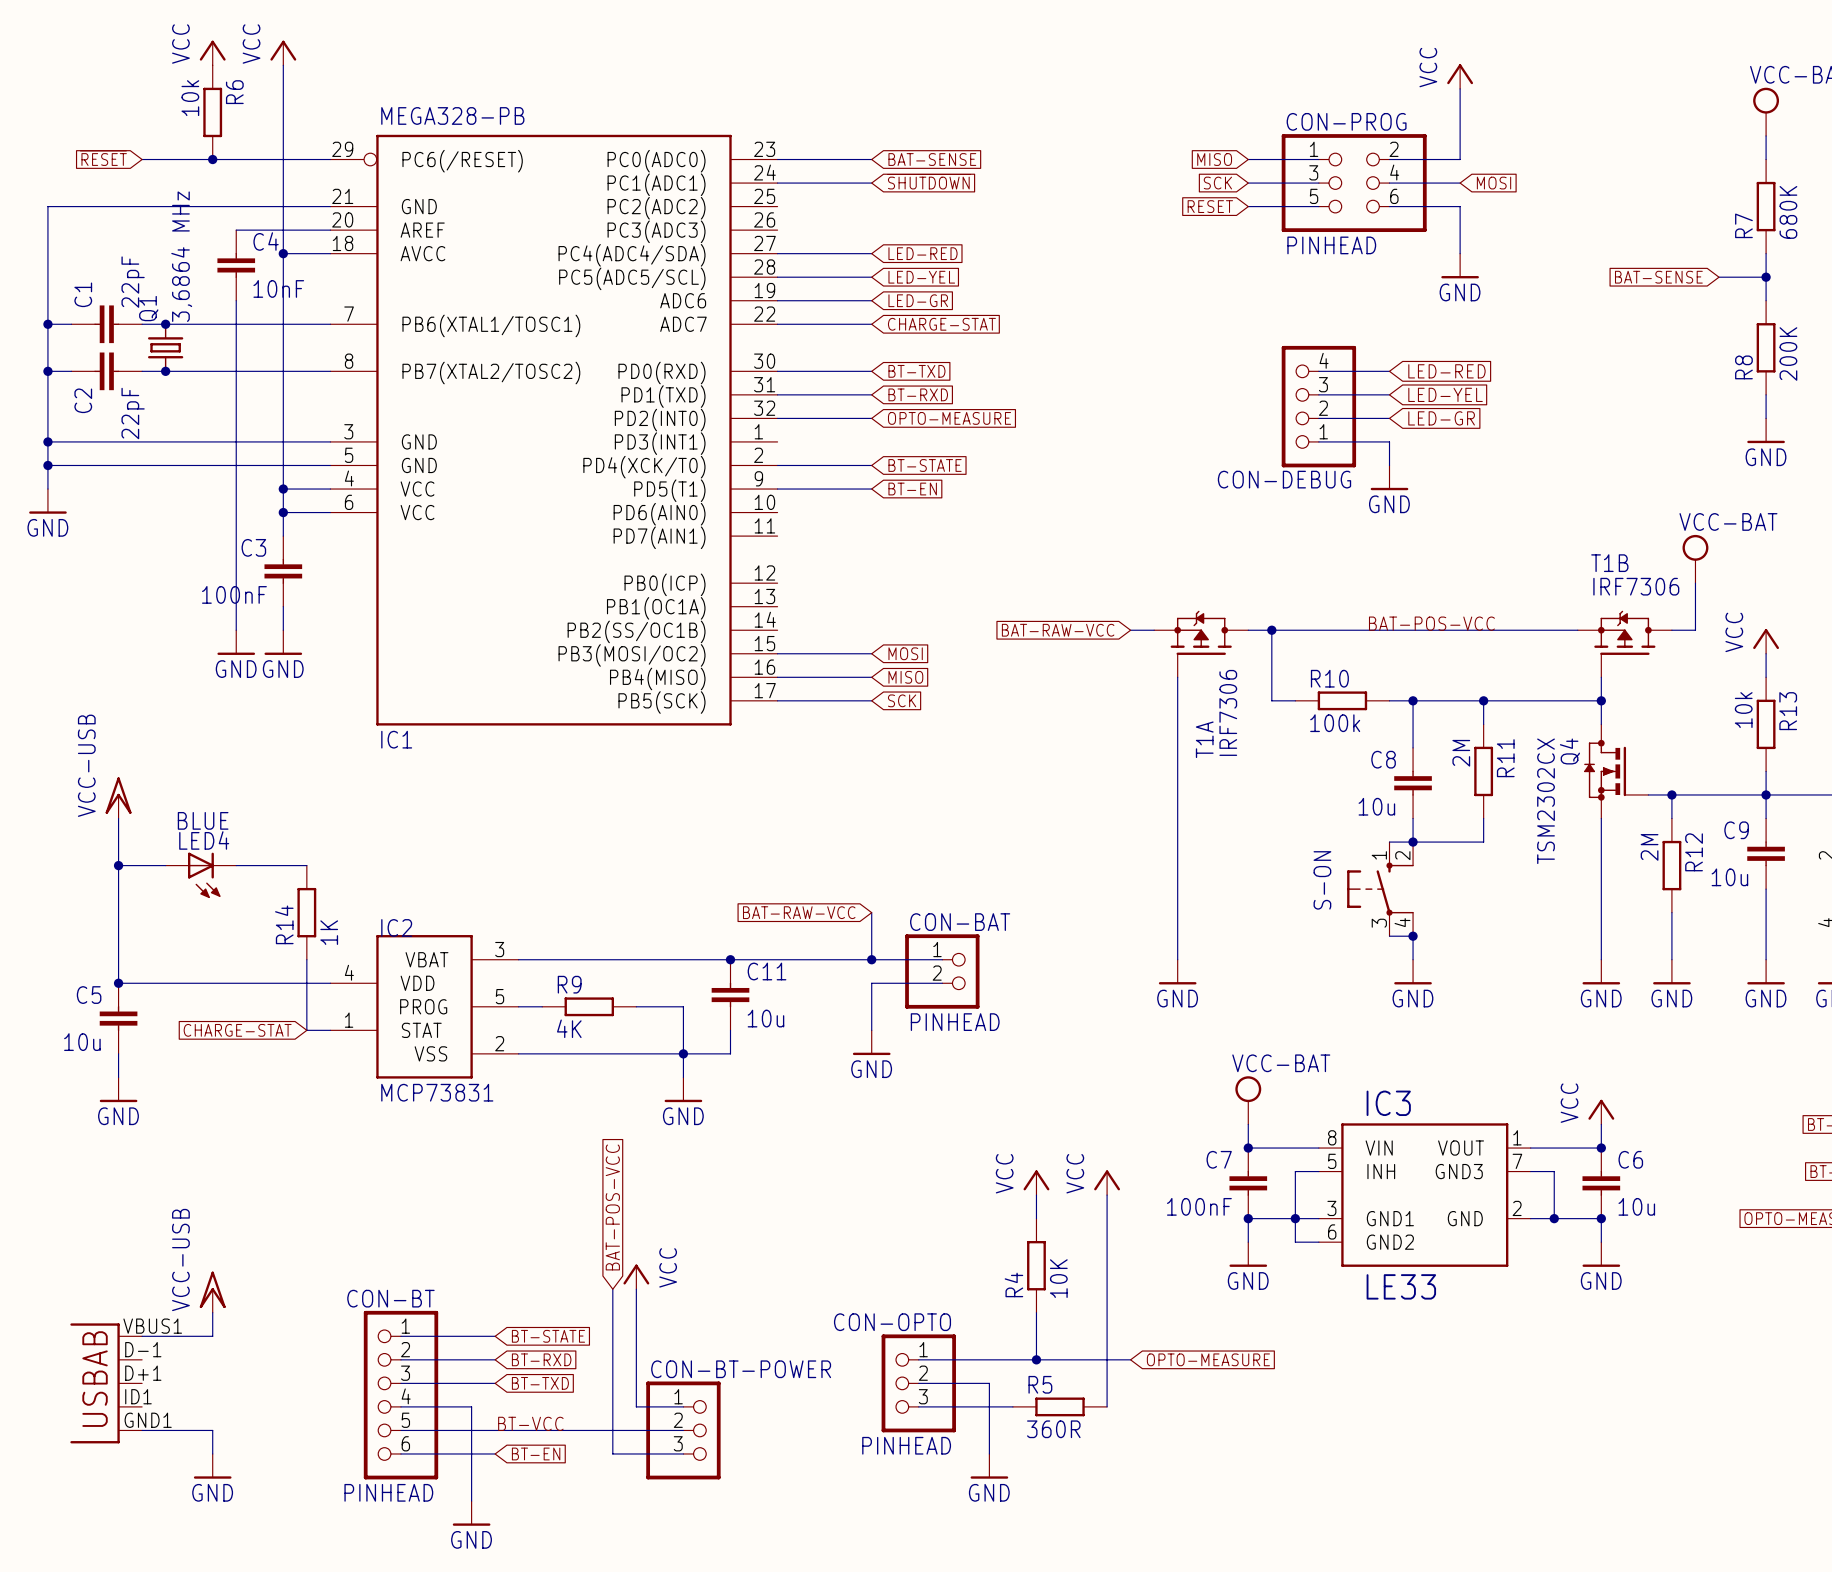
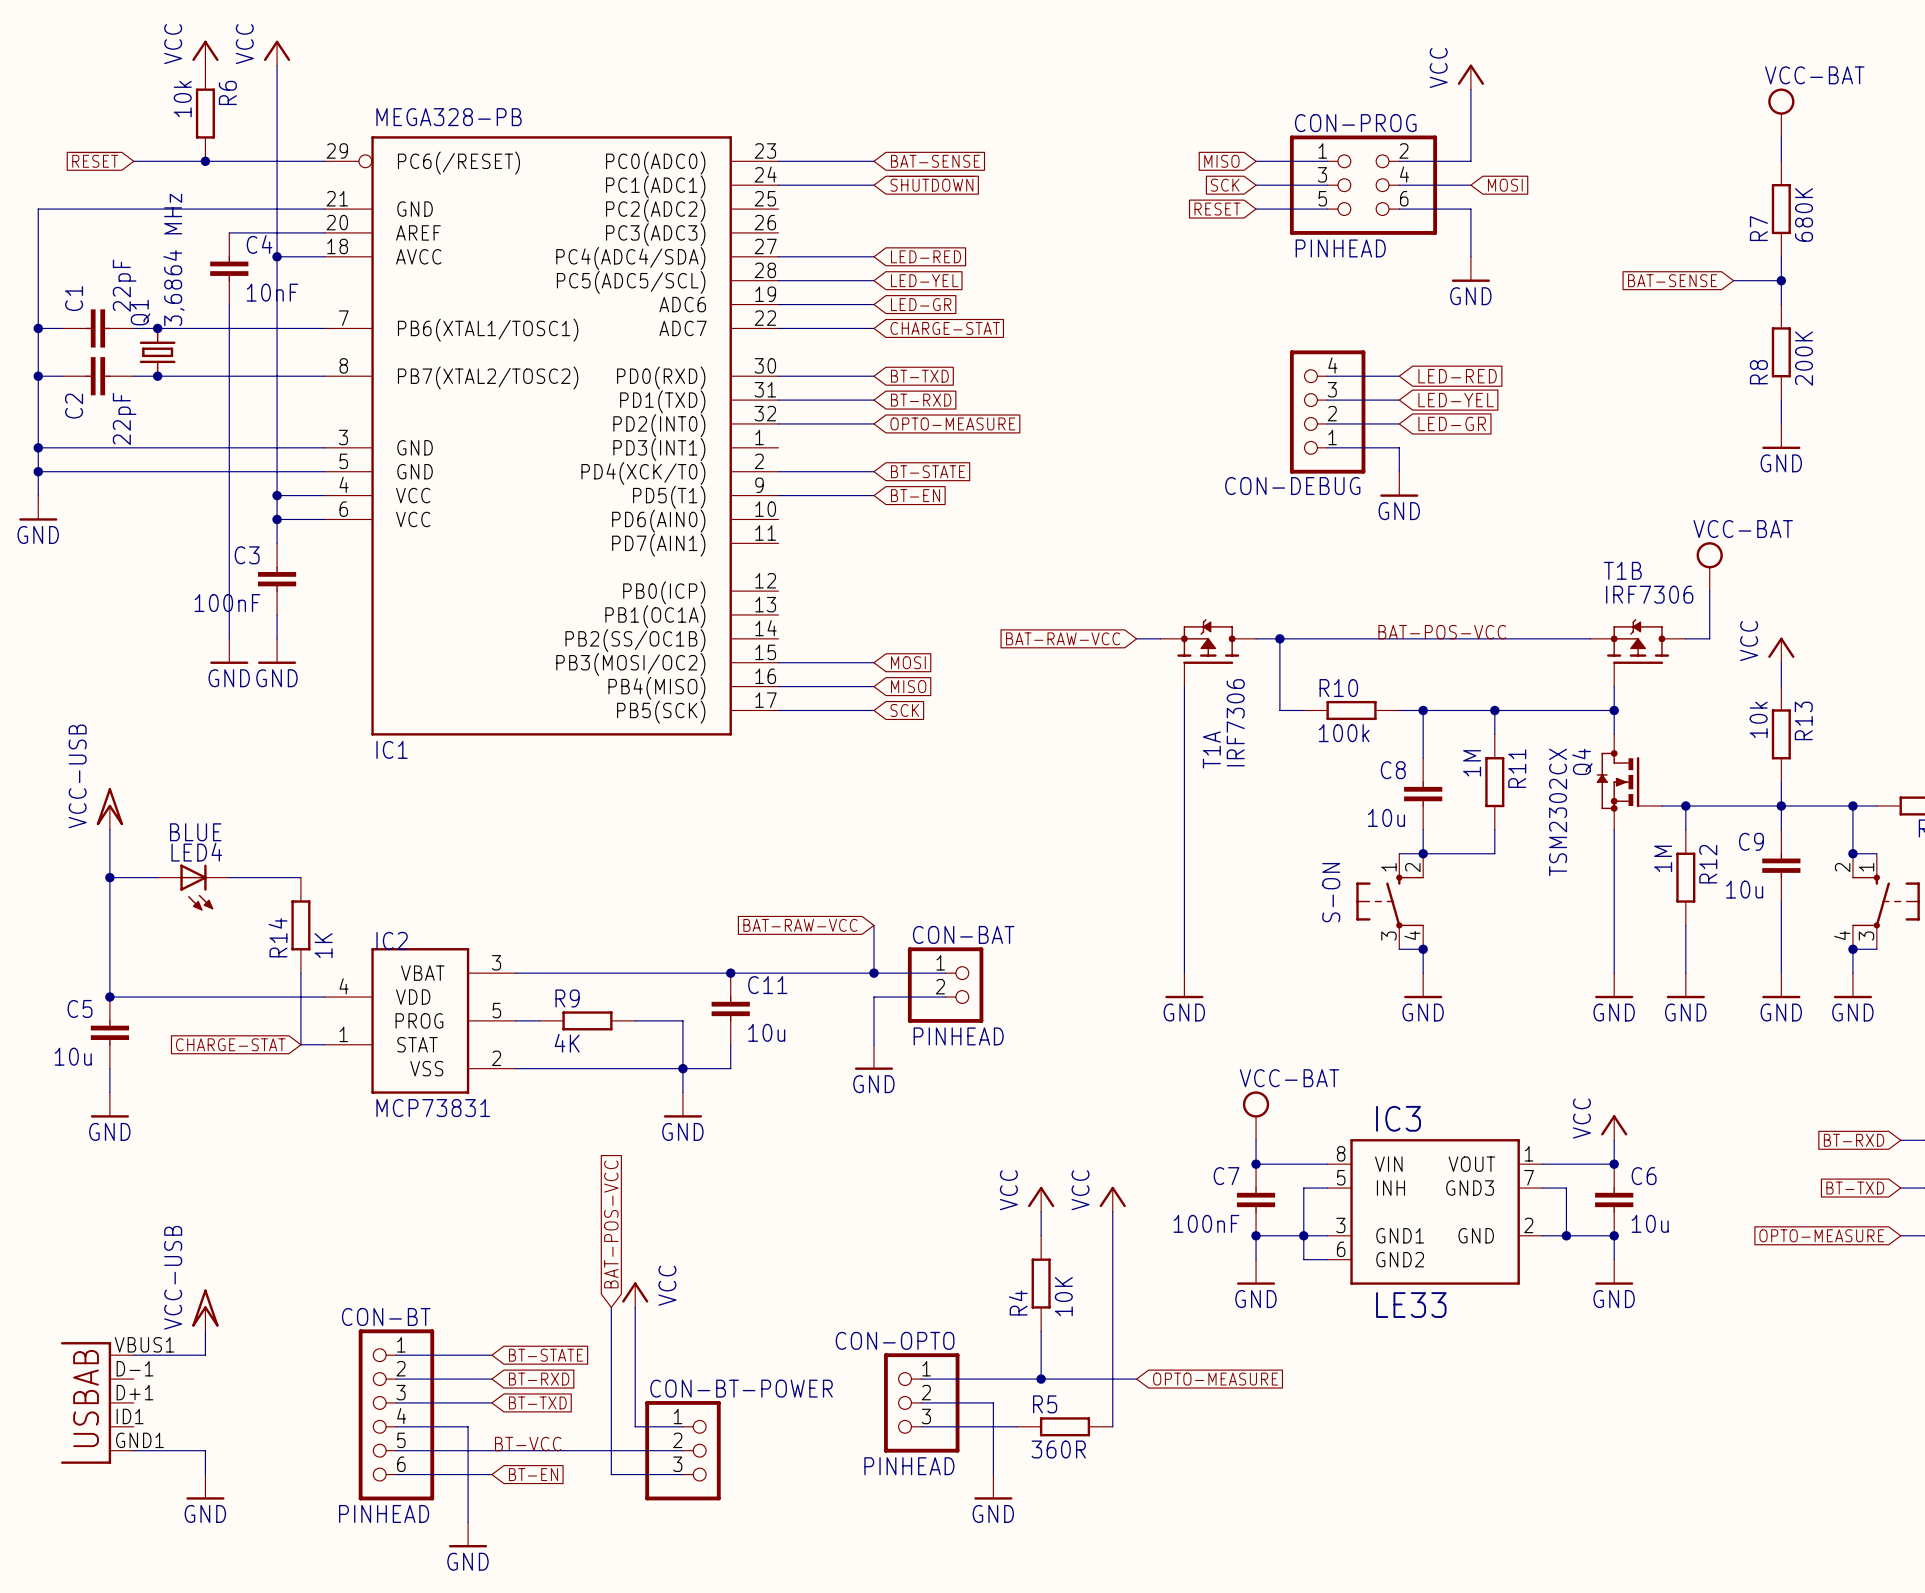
R11 value: 2M (1461, 753) -> 1M (1472, 763)
R12 value: 2M (1649, 847) -> 1M (1663, 858)

